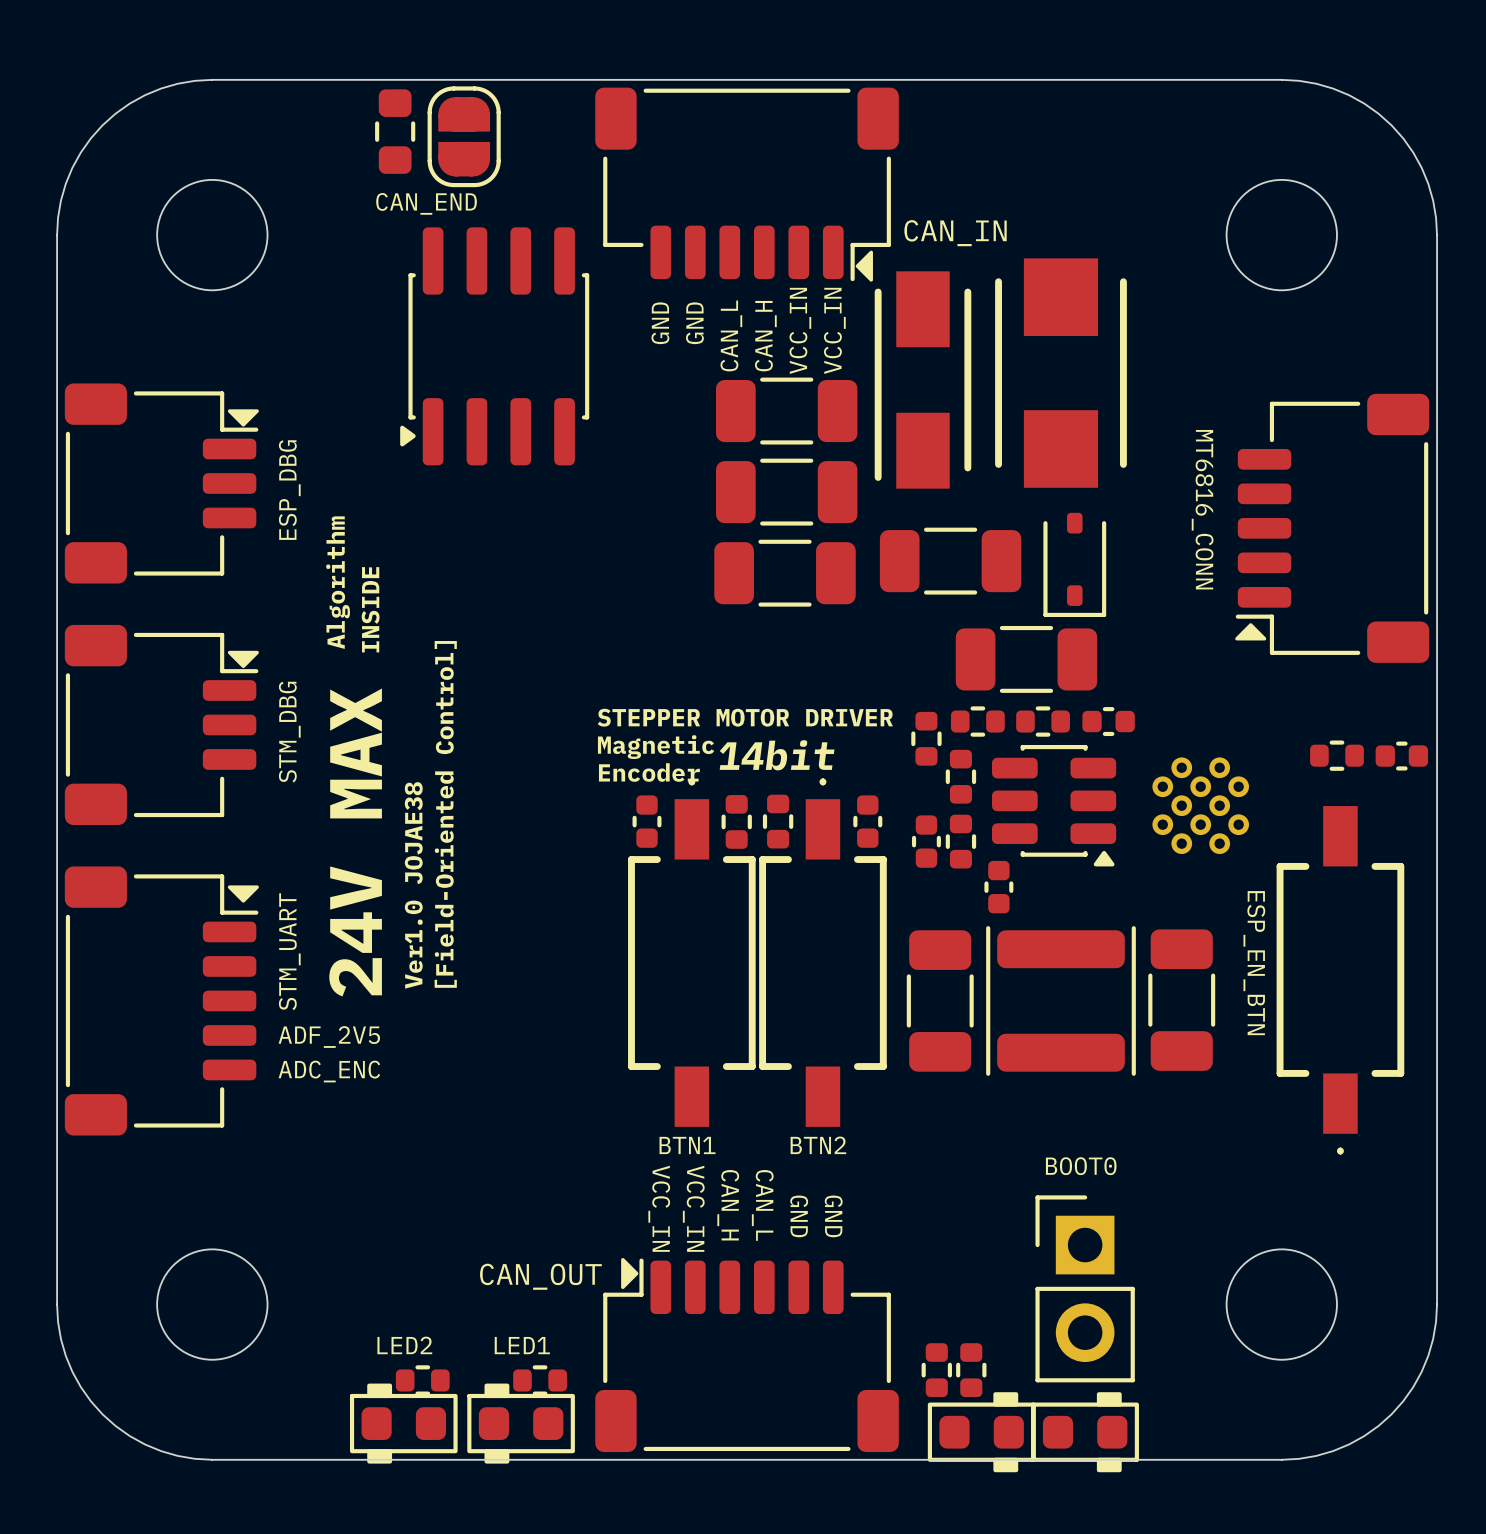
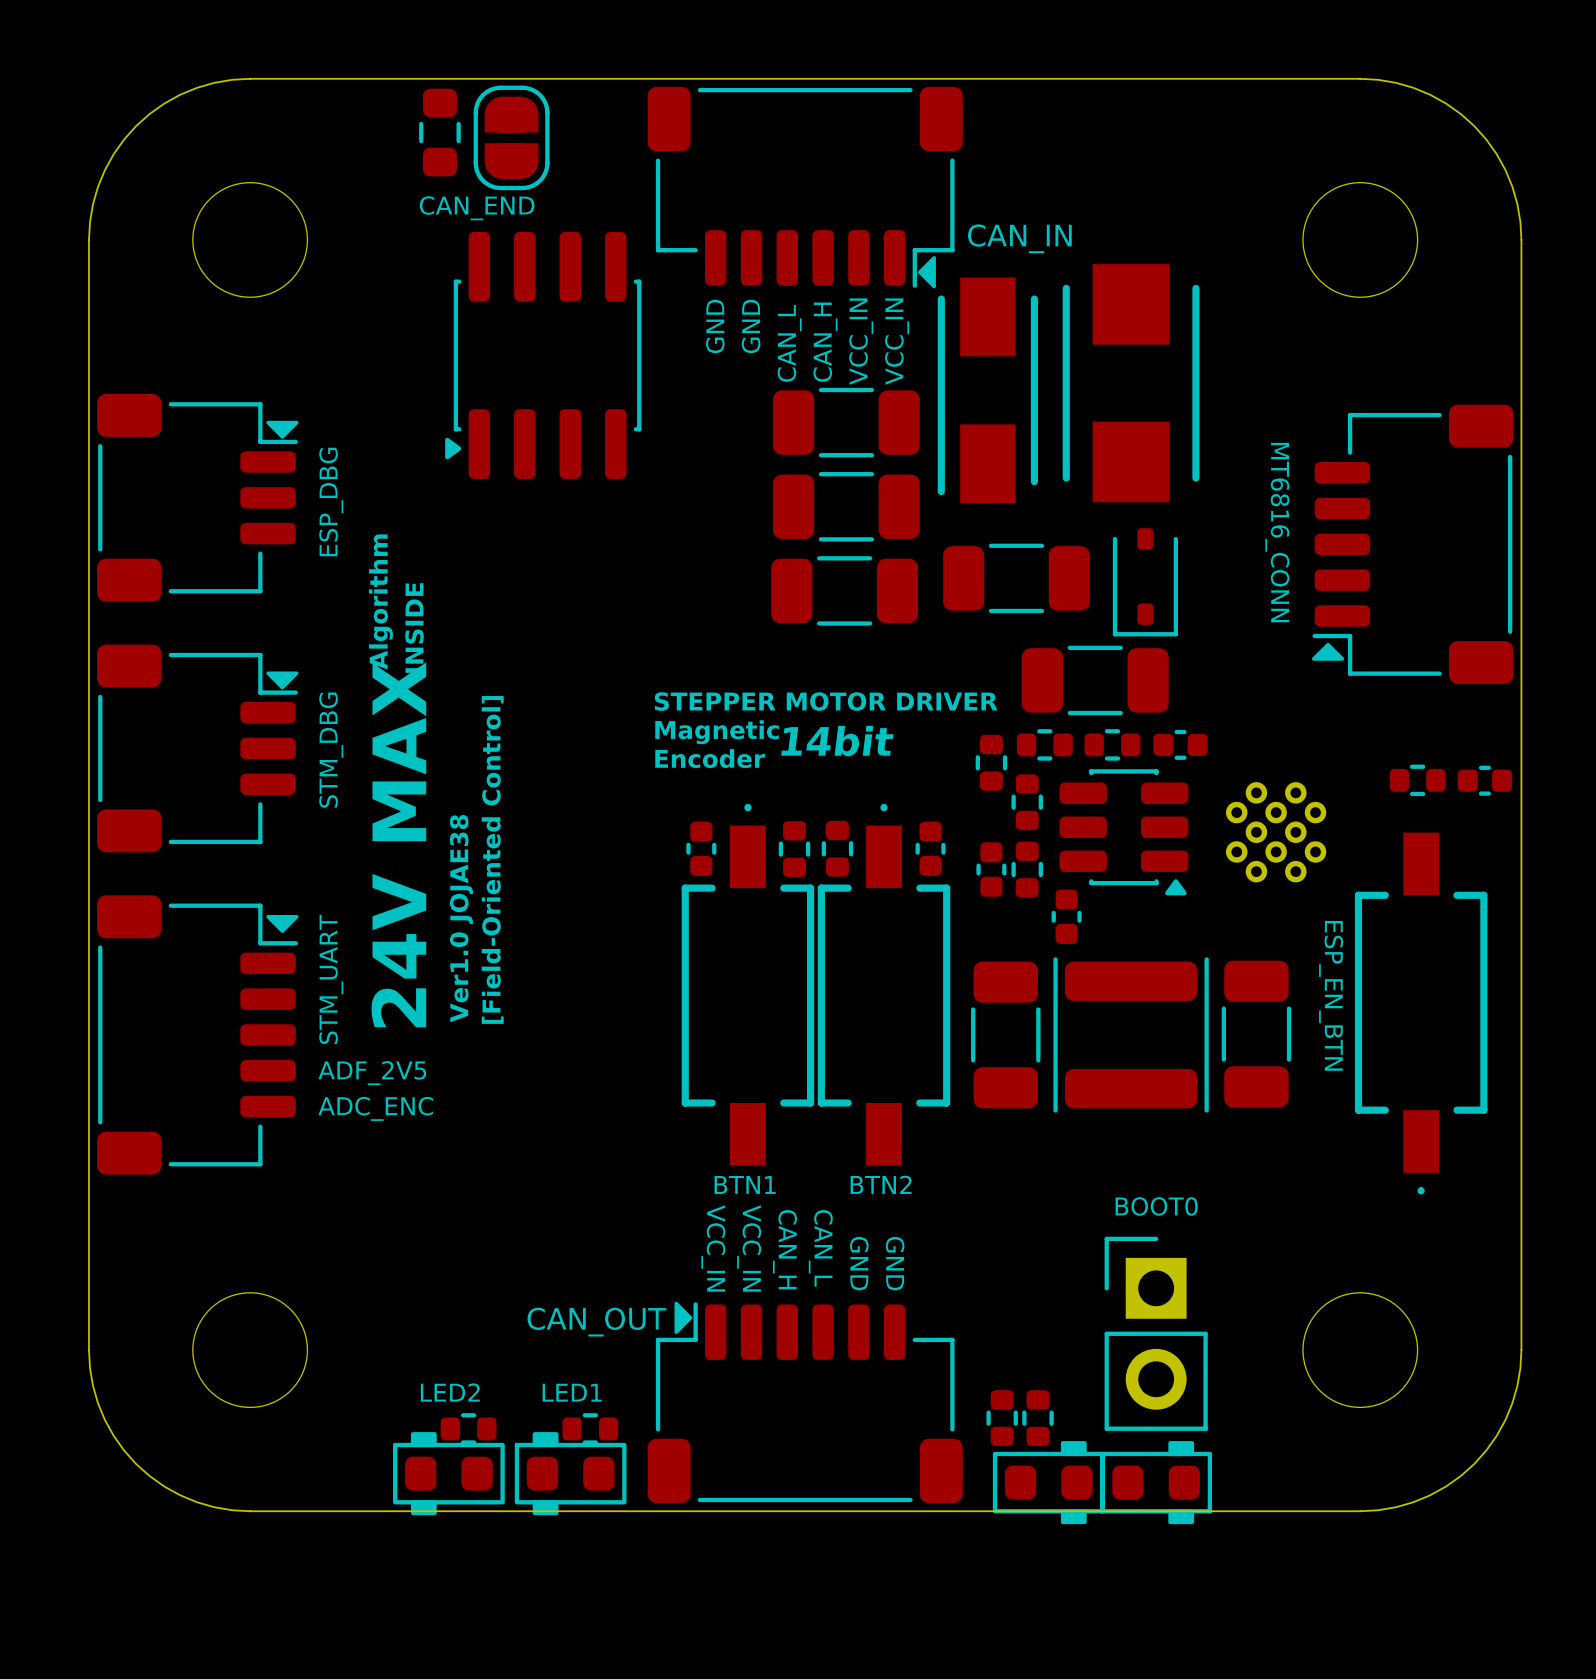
text position: STEPPER MOTOR DRIVER (745, 717) -> STEPPER MOTOR DRIVER (826, 701)
text position: Magnetic (656, 747) -> Magnetic (717, 732)
text position: 14bit (777, 755) -> 14bit (837, 741)
text position: Encoder (649, 772) -> Encoder (710, 758)

